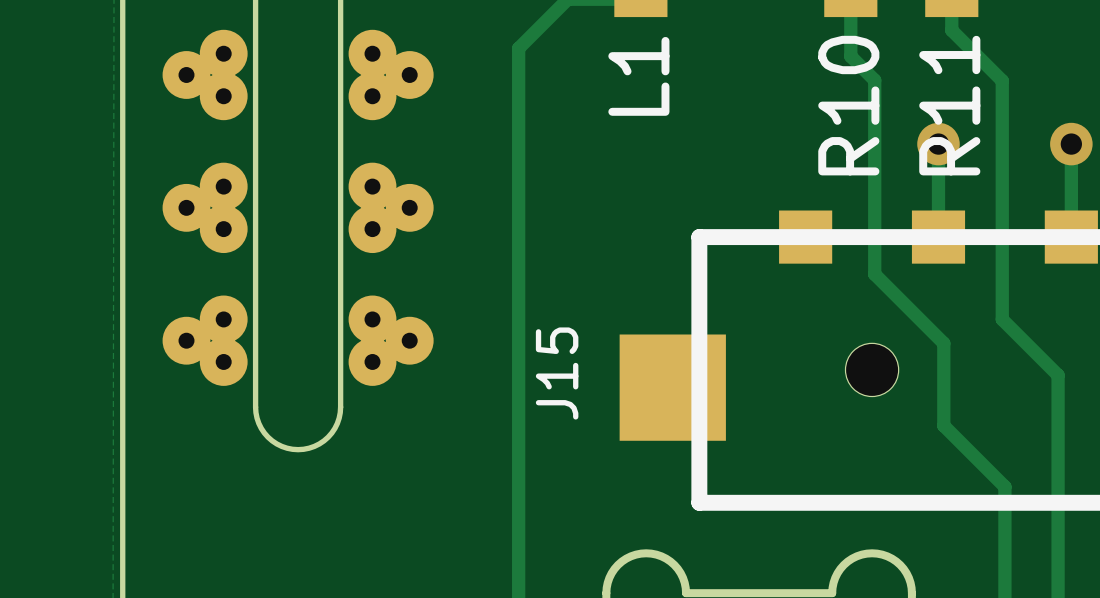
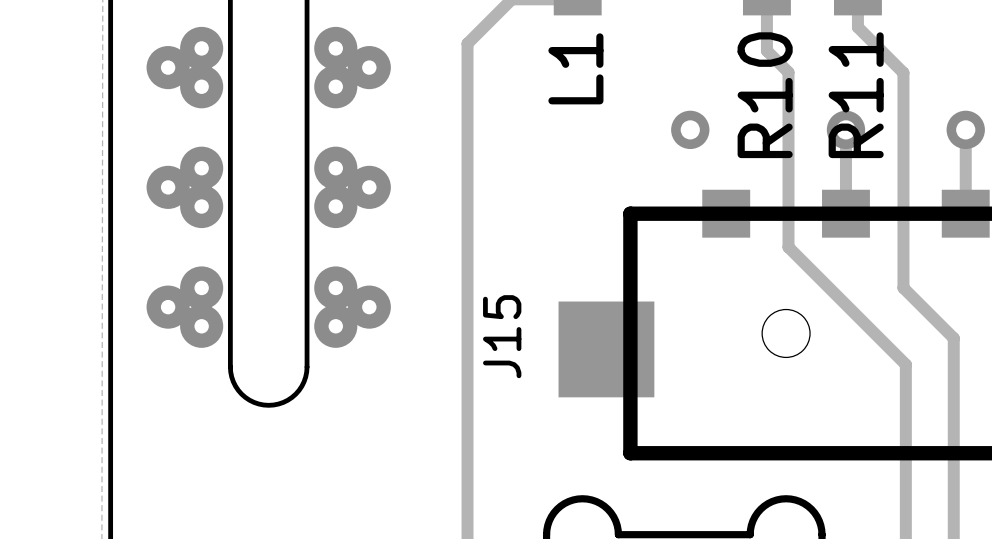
via: none -> (690, 129)
track: (943, 343) (943, 425) (1004, 486) -> (850, 309) (905, 364) (905, 438)

